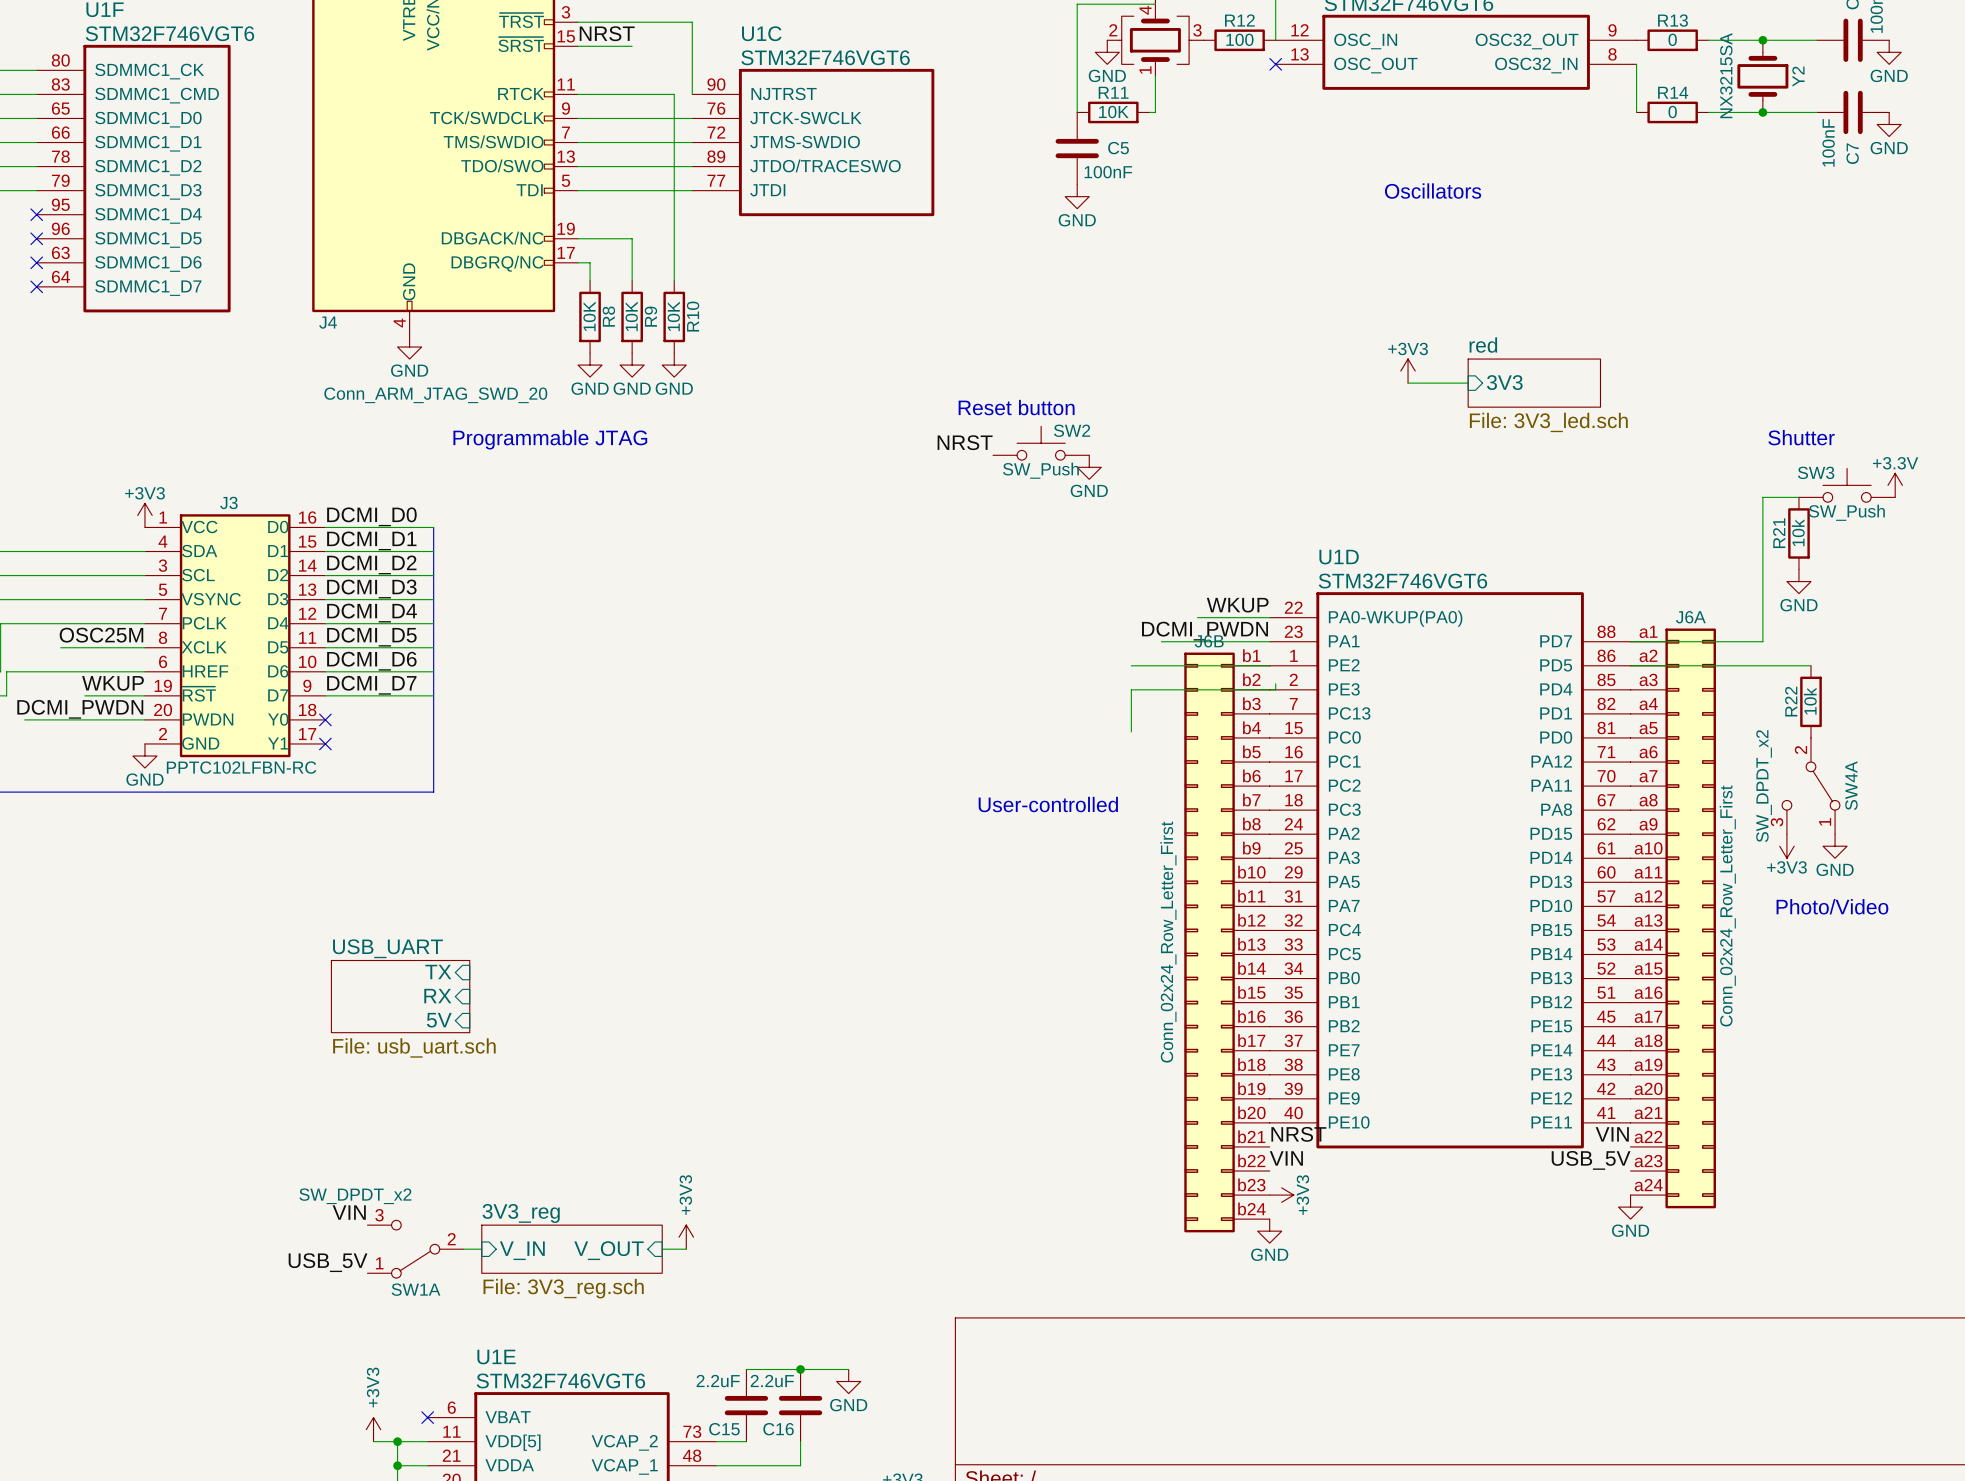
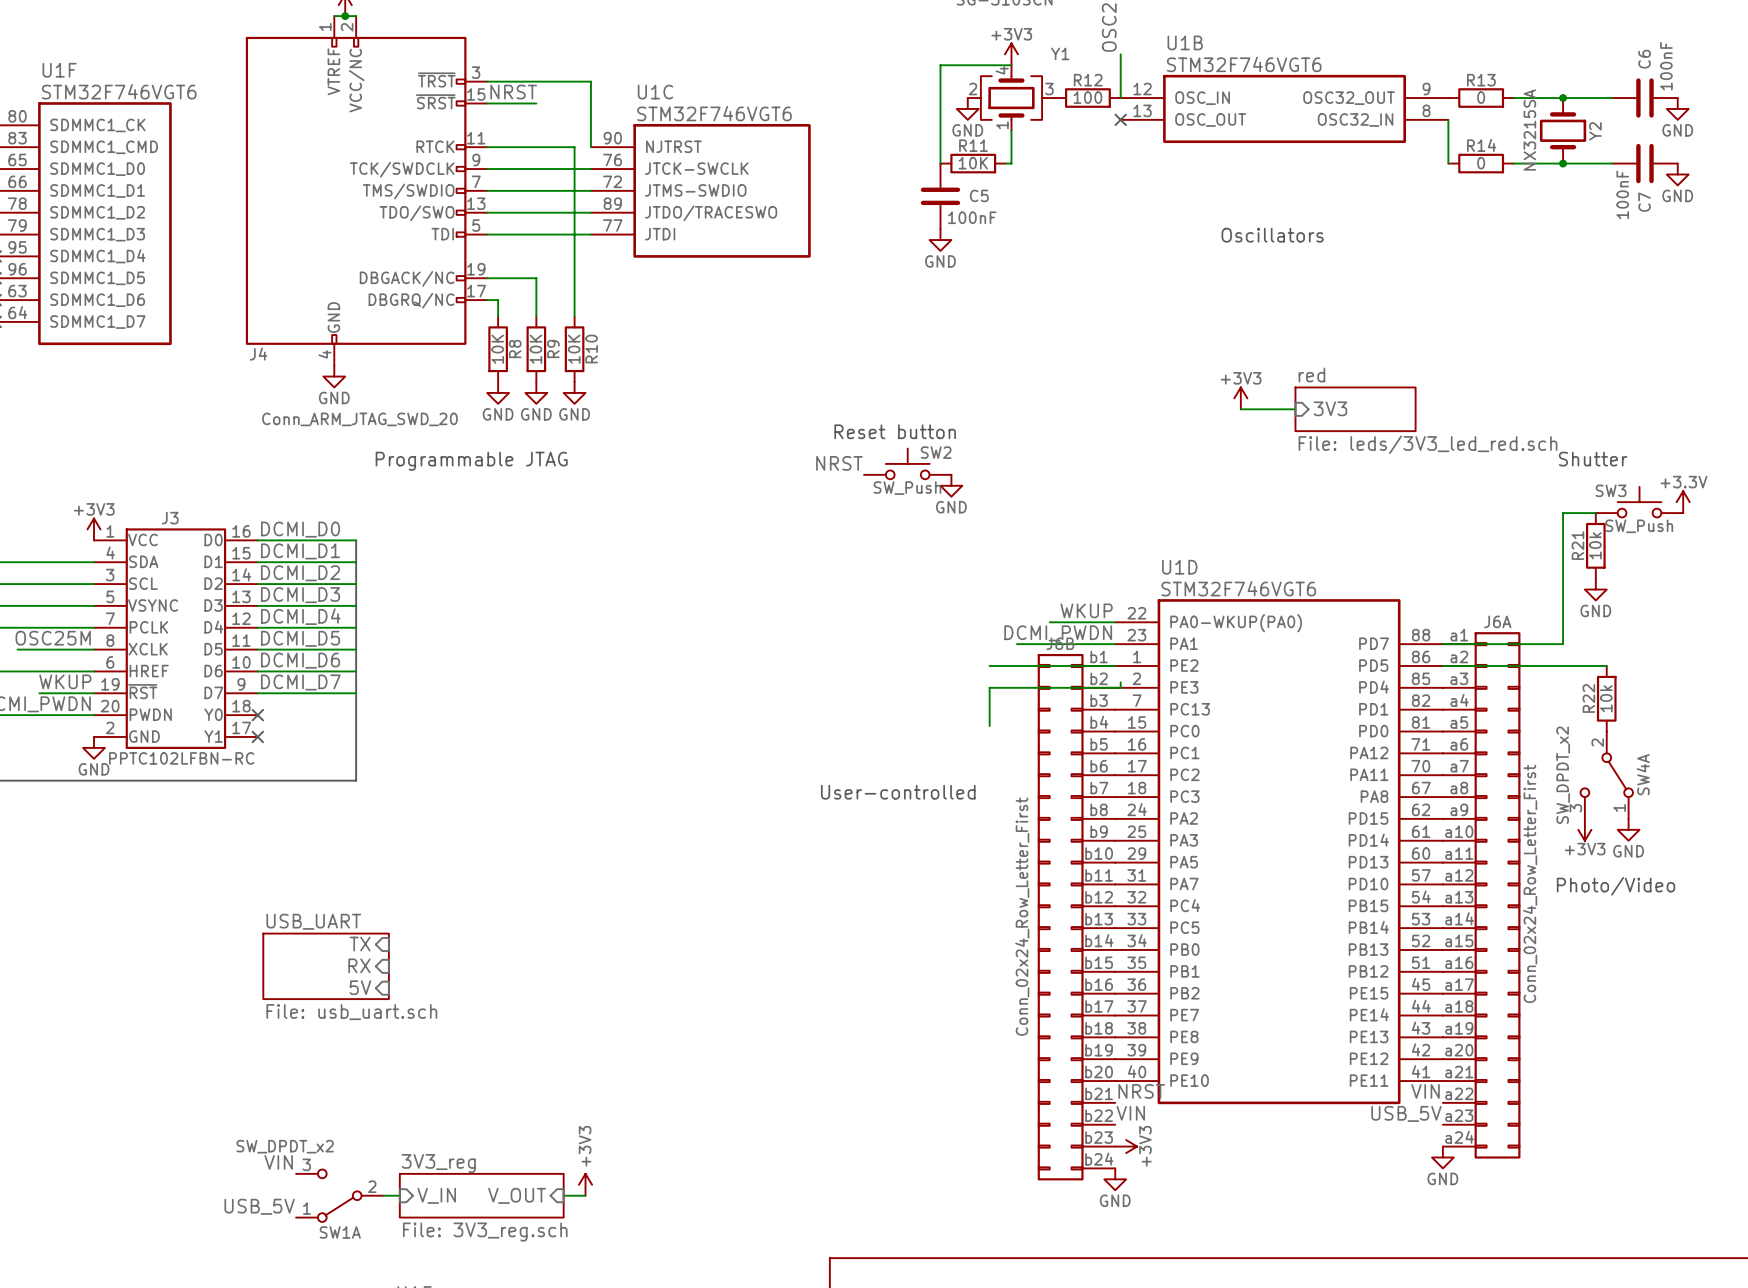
sheet red value: File: 3V3_led.sch (1548, 422) -> File: leds/3V3_led_red.sch (1428, 444)

